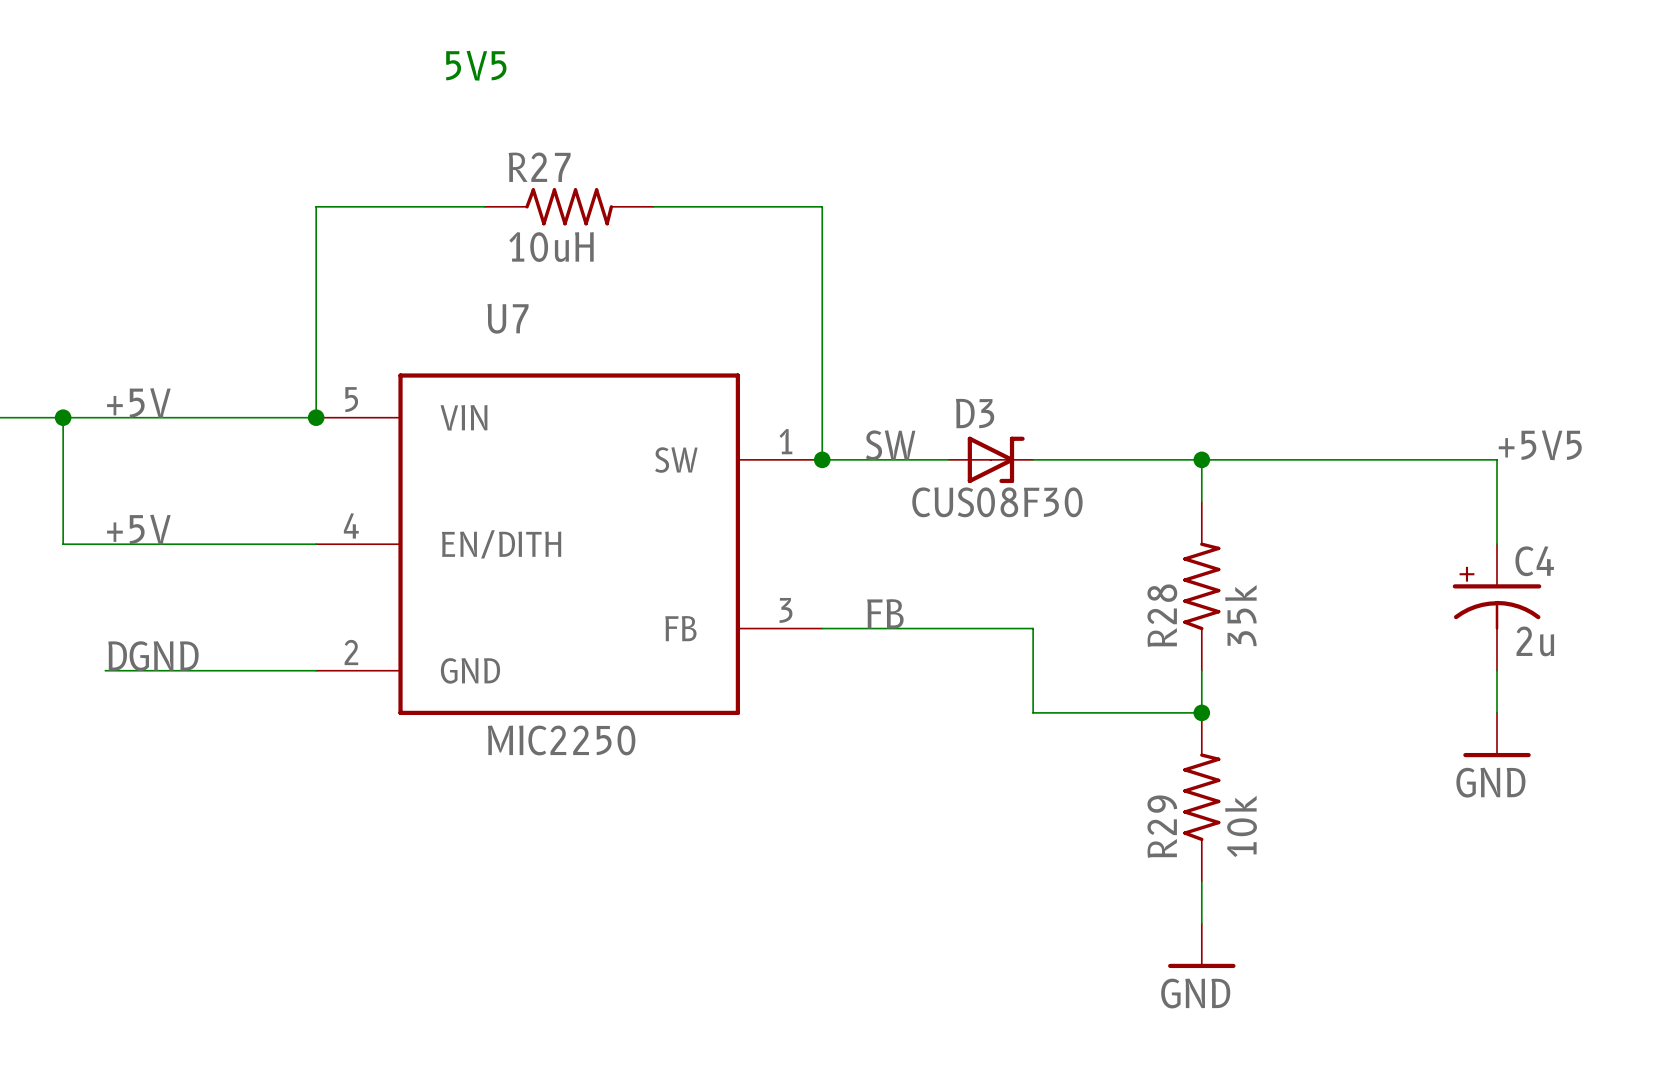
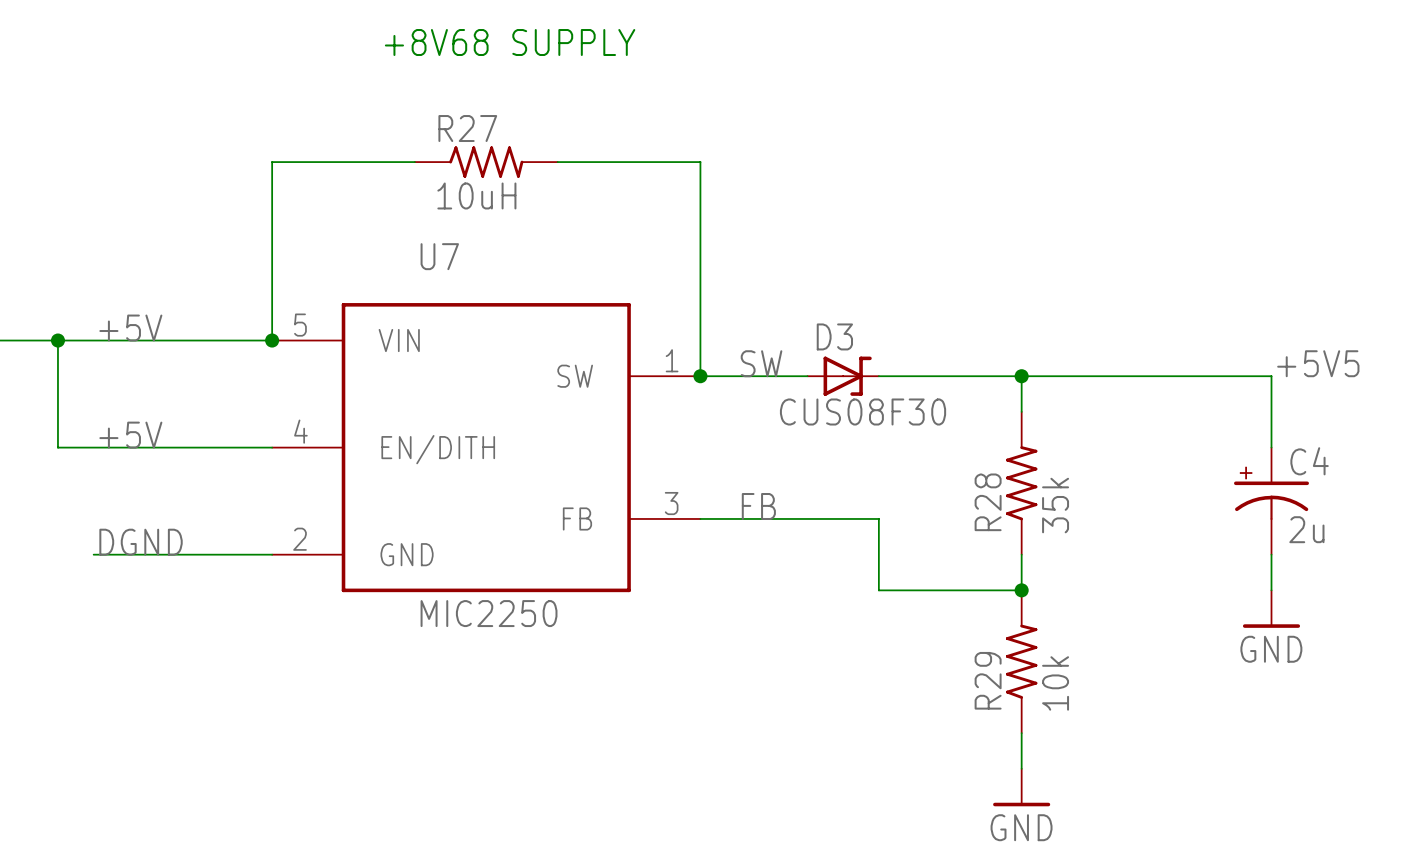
text: 5V5 (476, 65) -> +8V68 SUPPLY (510, 42)

